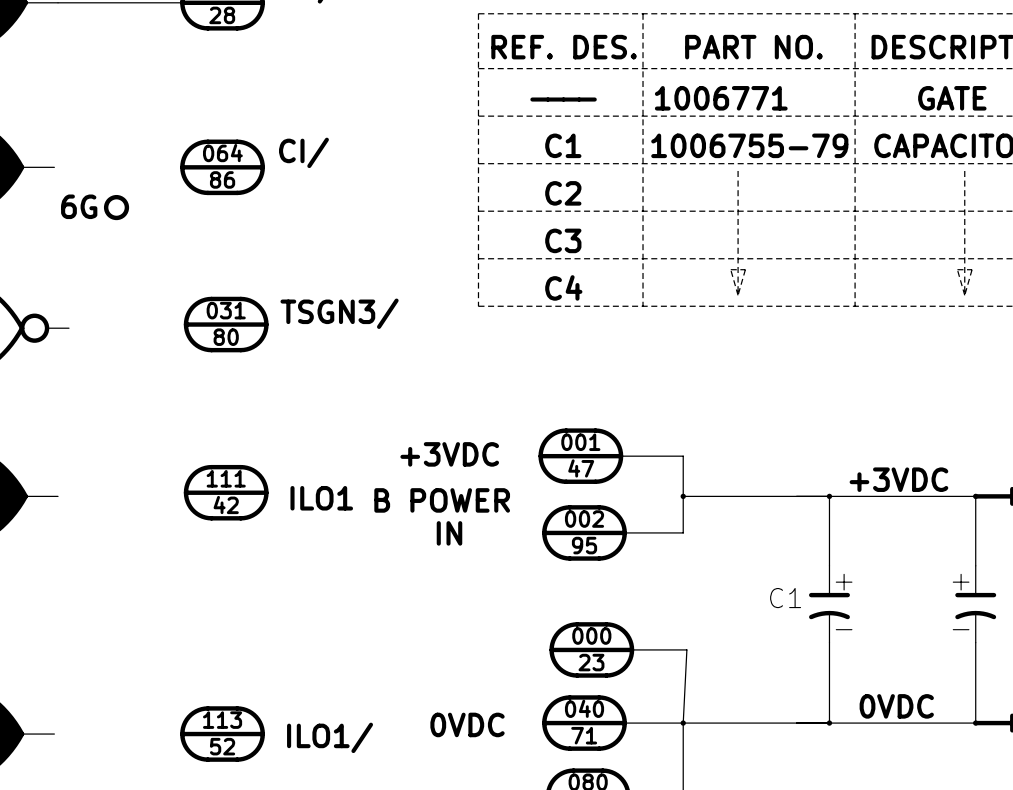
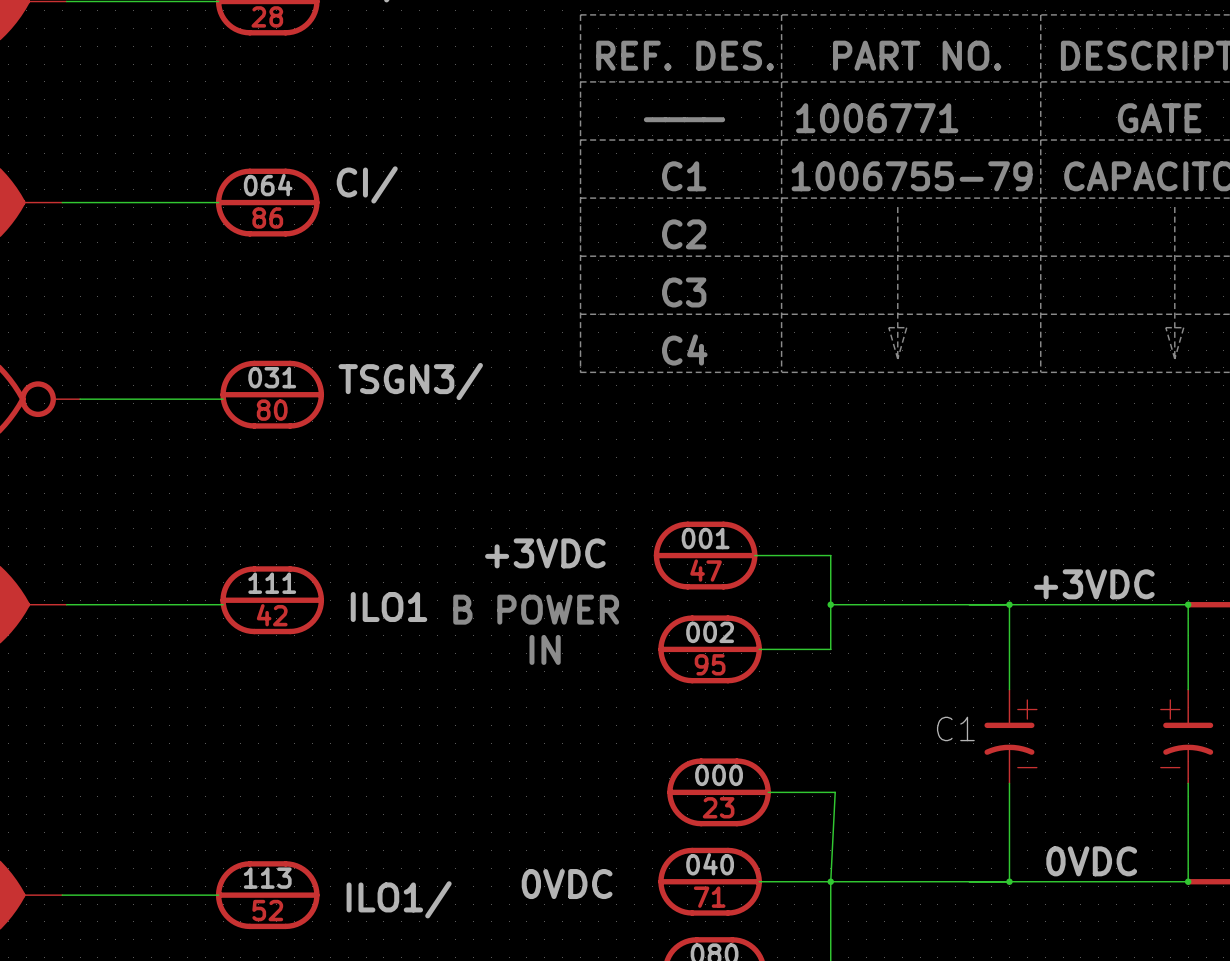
wire: none -> (62, 202) (218, 202)
part: (116, 207) -> none
wire: none -> (80, 399) (223, 399)
wire: none -> (66, 604) (223, 604)
wire: none -> (62, 895) (218, 895)

